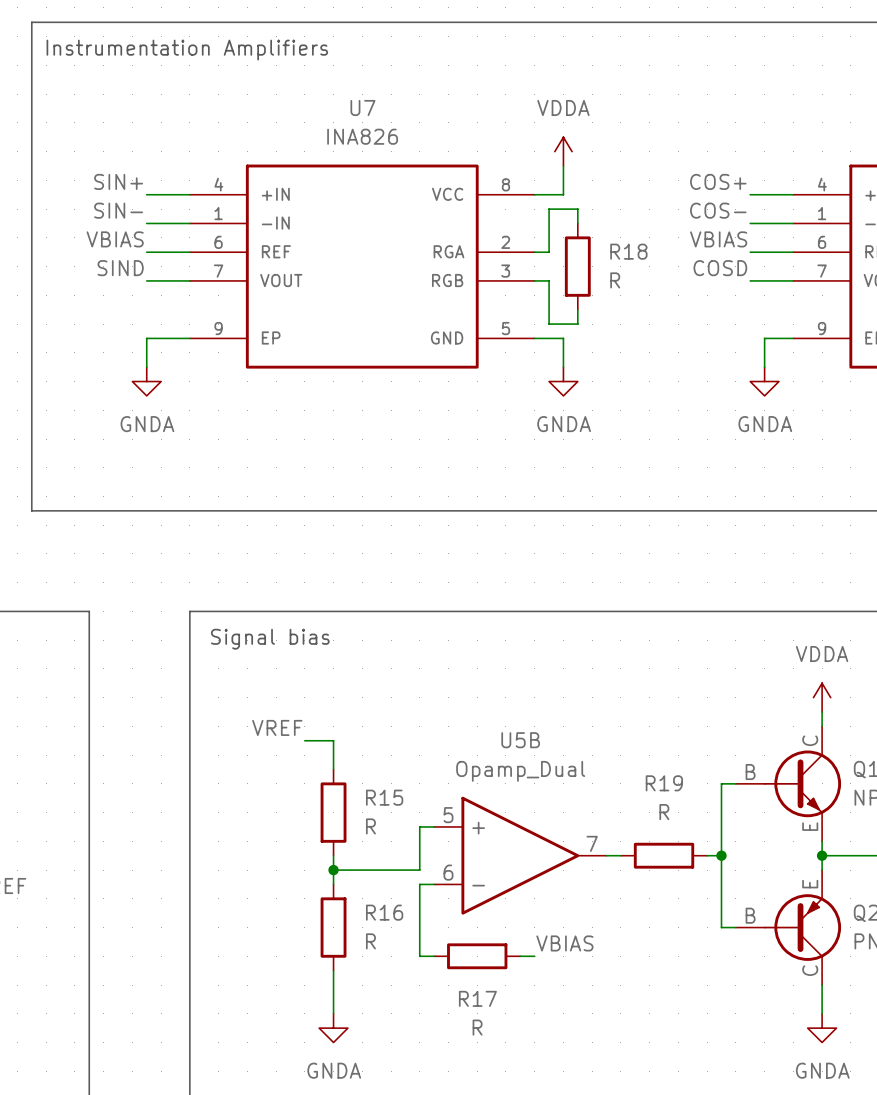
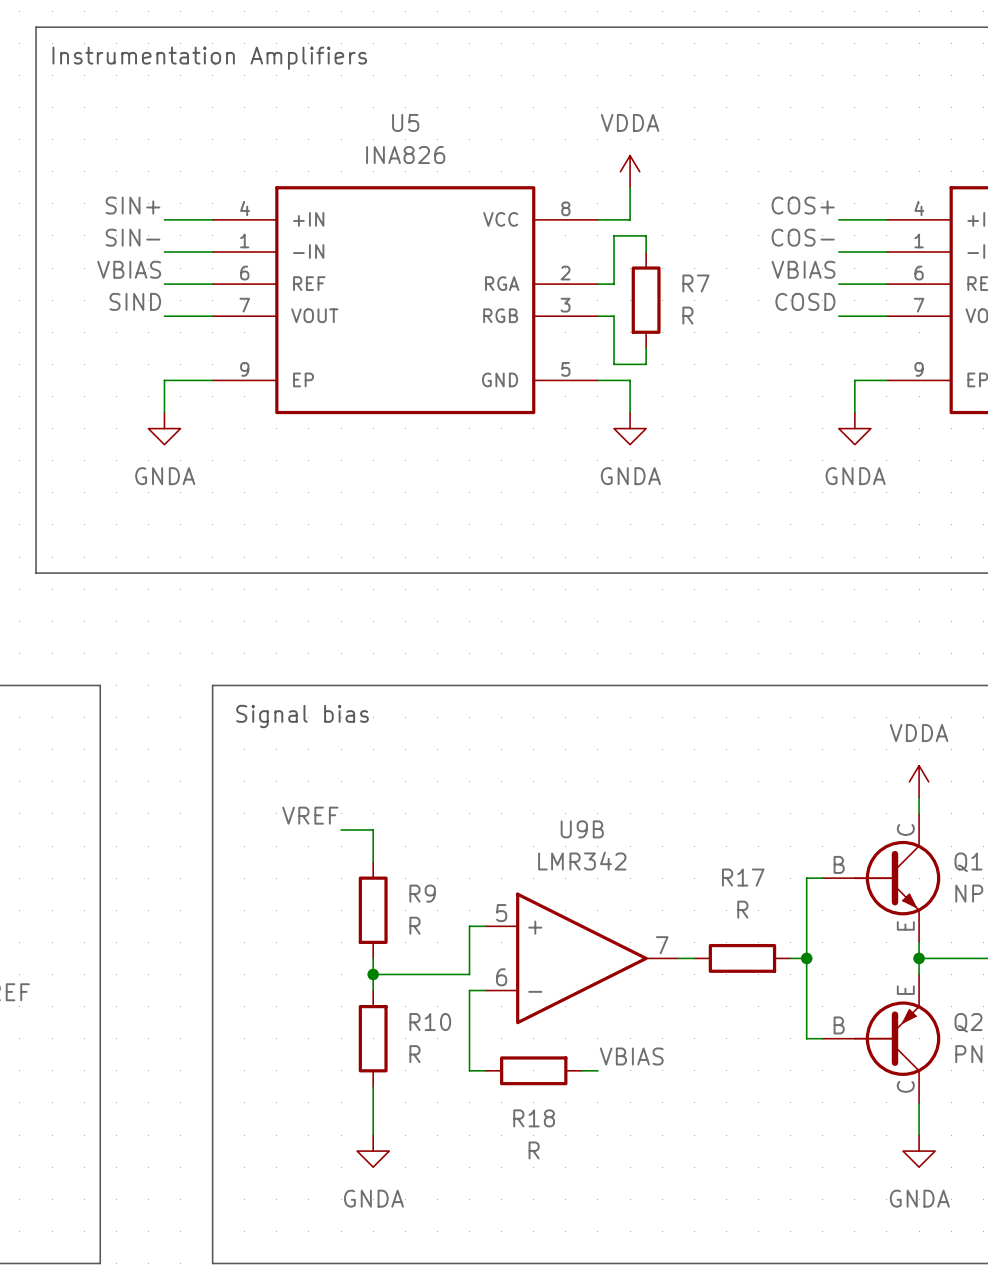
U7 name: U7 (362, 107) -> U5 (405, 122)
R18 name: R18 (628, 251) -> R7 (695, 283)
U5B name: U5B (520, 740) -> U9B (582, 829)
U5B value: Opamp_Dual (520, 771) -> LMR342 (582, 861)
R19 name: R19 (664, 783) -> R17 (743, 877)
R15 name: R15 (384, 797) -> R9 (422, 893)
R16 name: R16 (384, 912) -> R10 (430, 1022)
R17 name: R17 (477, 998) -> R18 (534, 1118)

